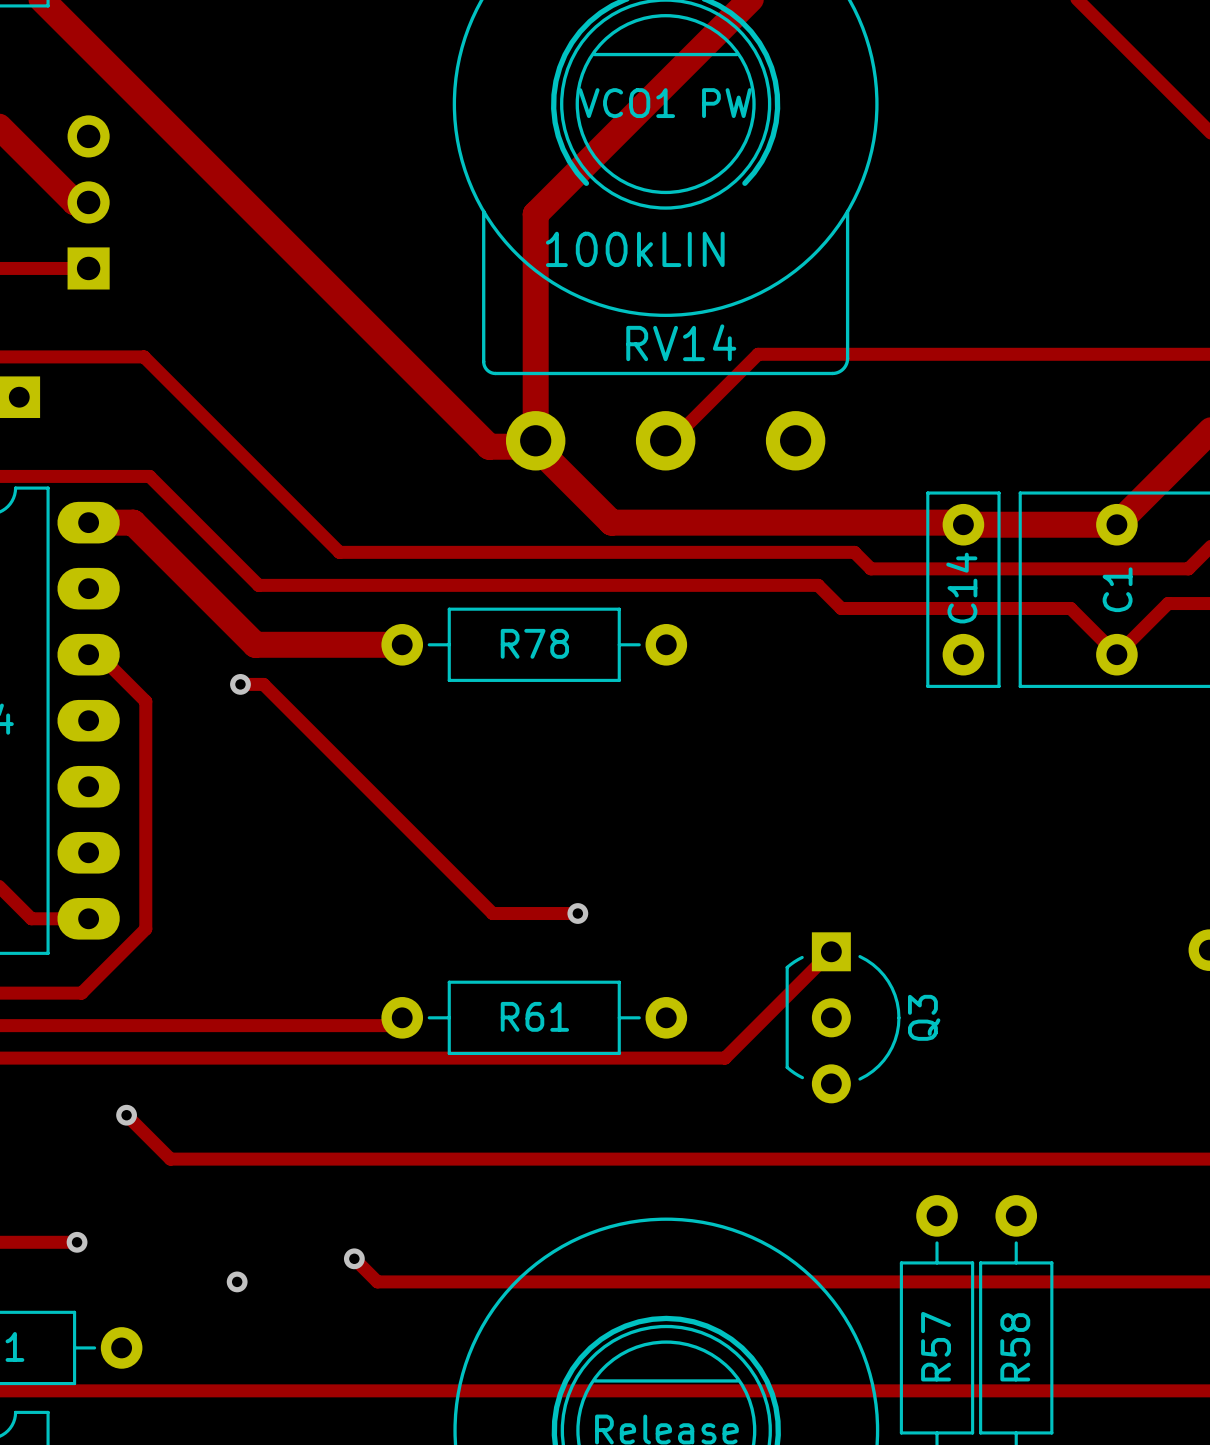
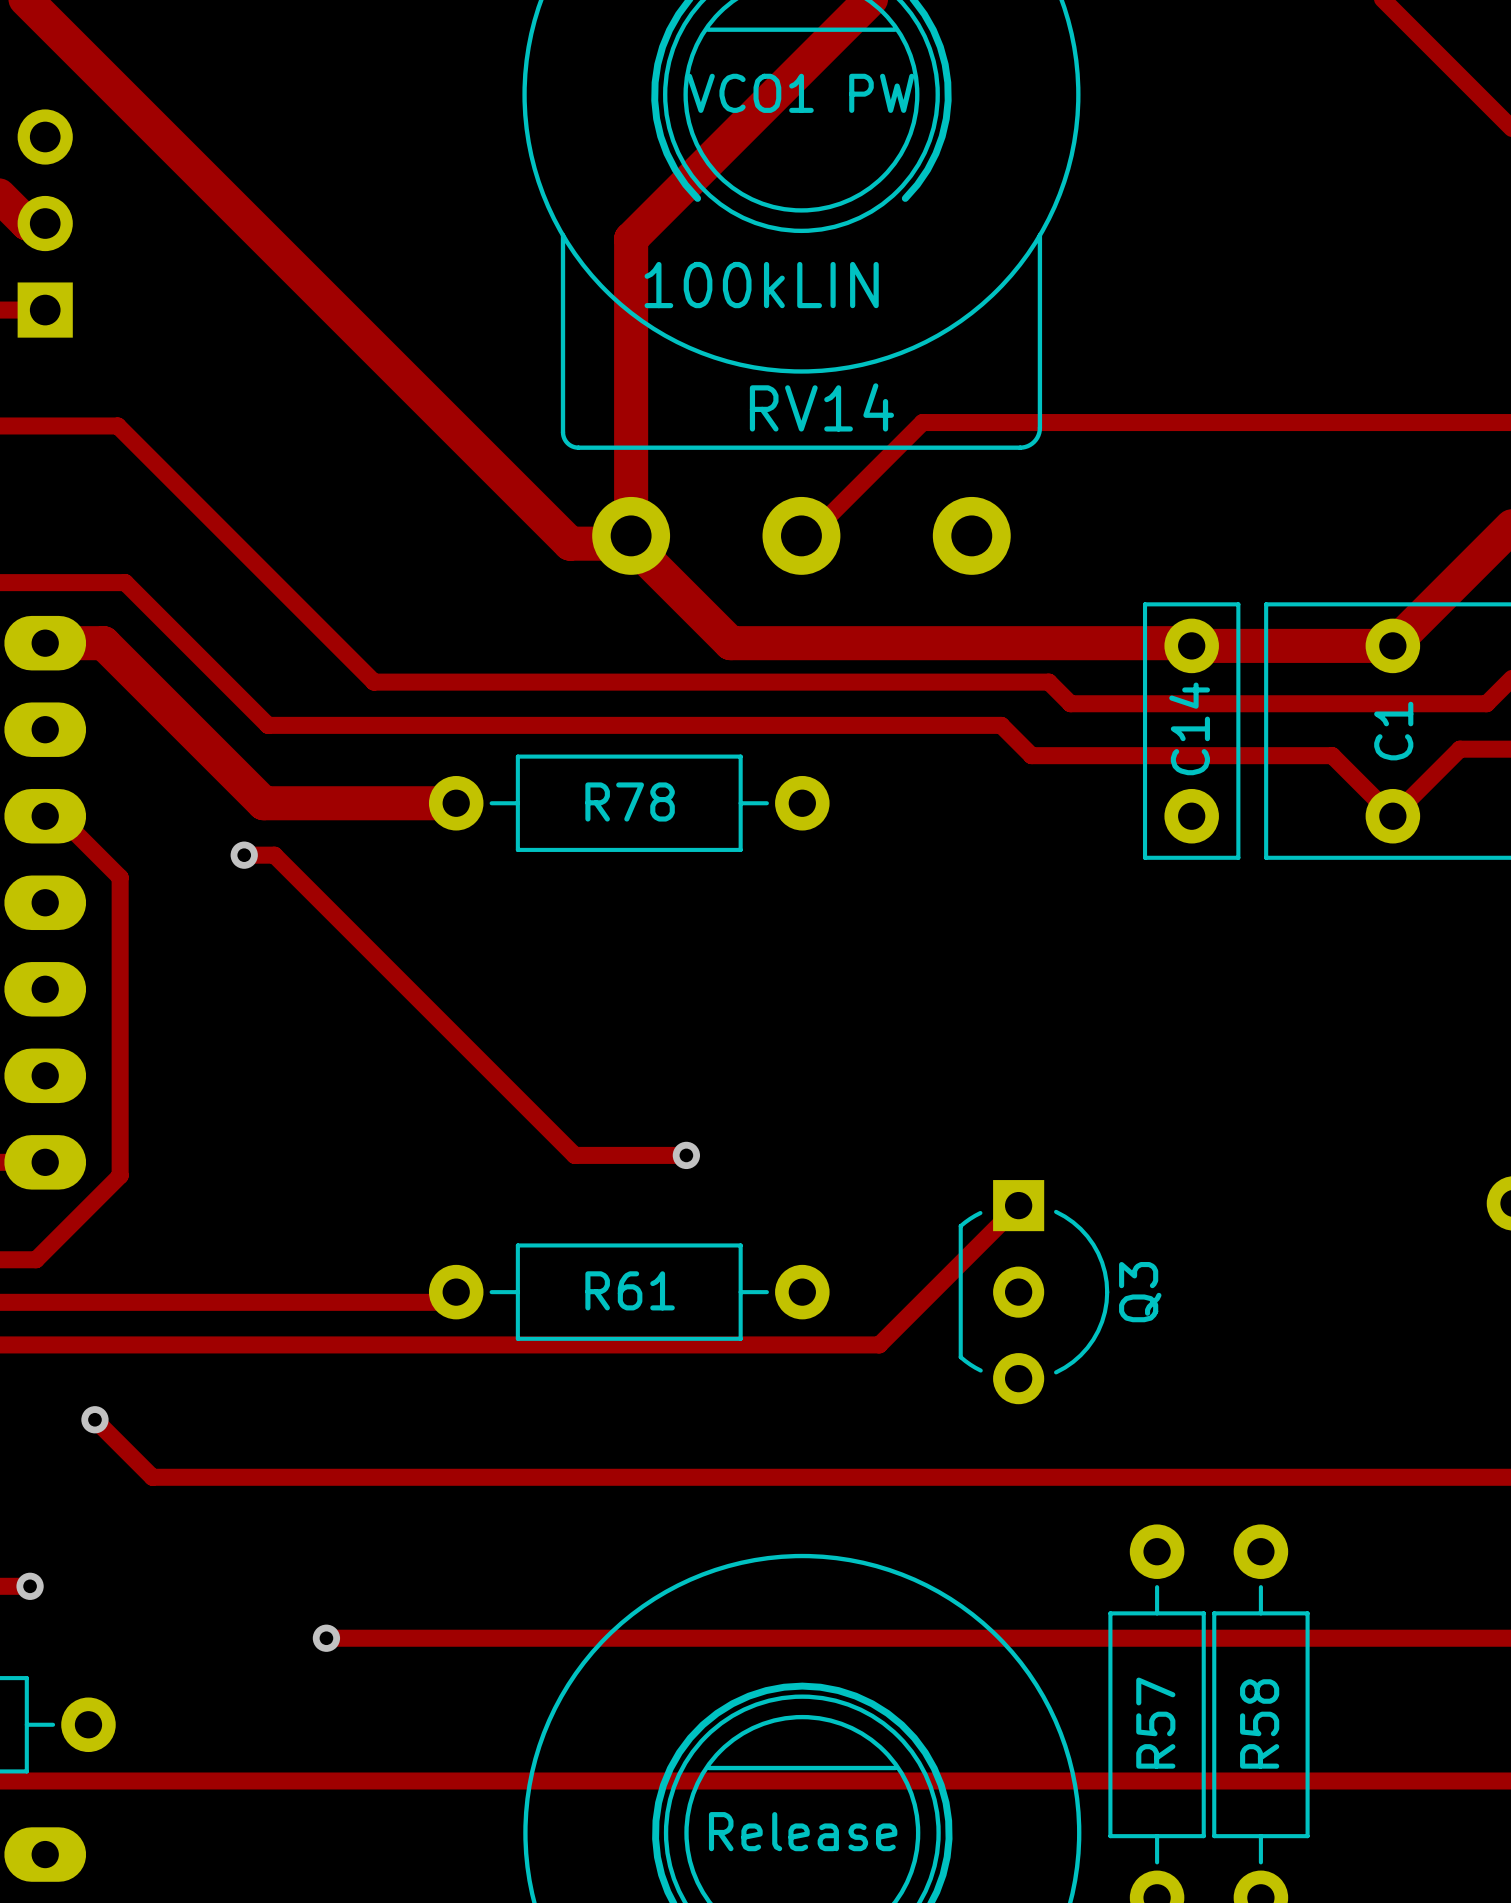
track: (354, 1258) (377, 1281) -> (326, 1638) (423, 1638)
via: (354, 1258) -> none
via: (237, 1281) -> none
via: none -> (326, 1638)

